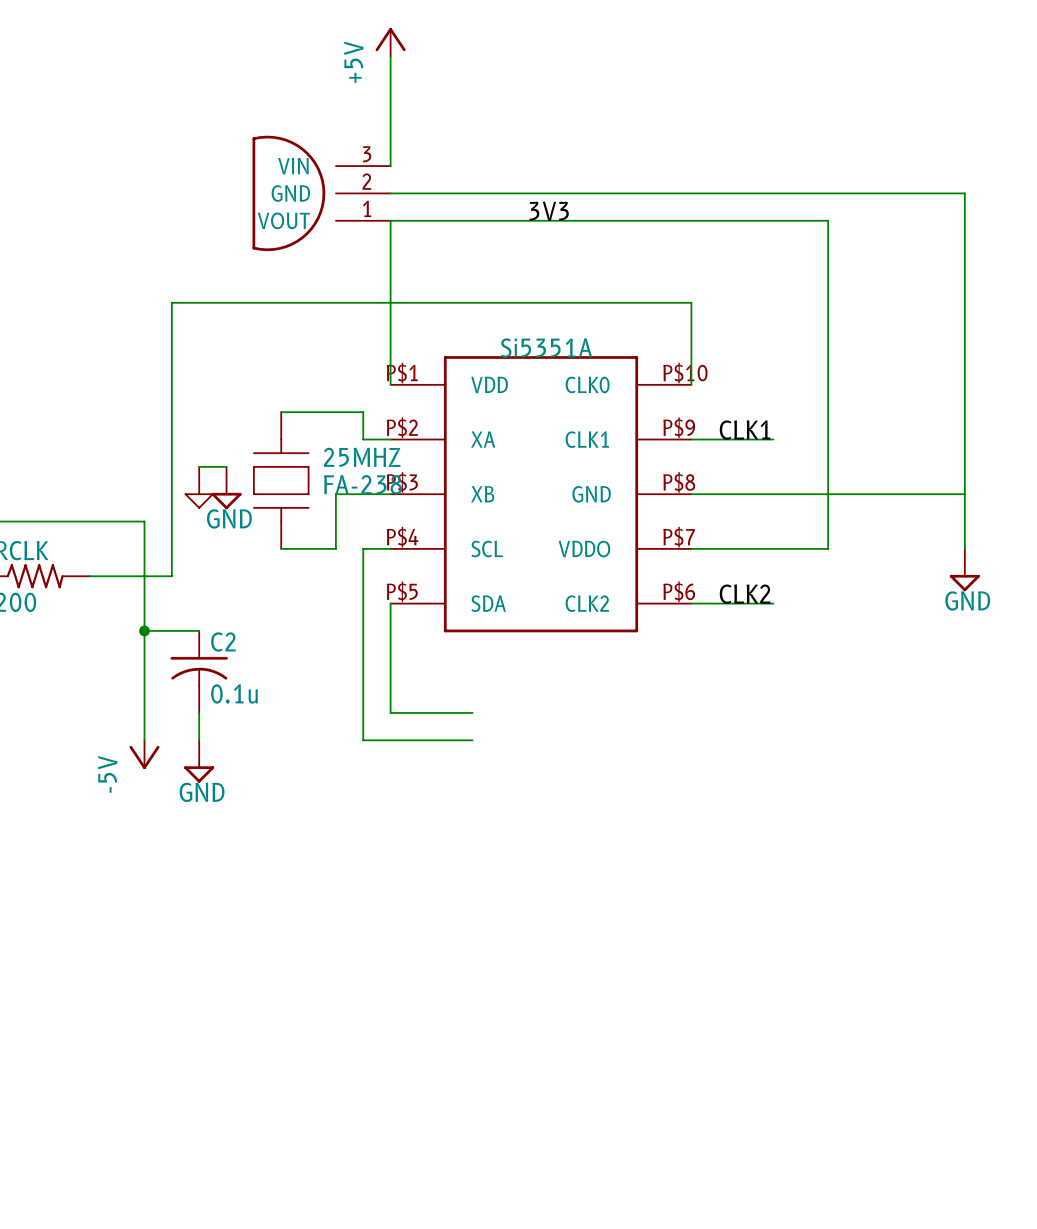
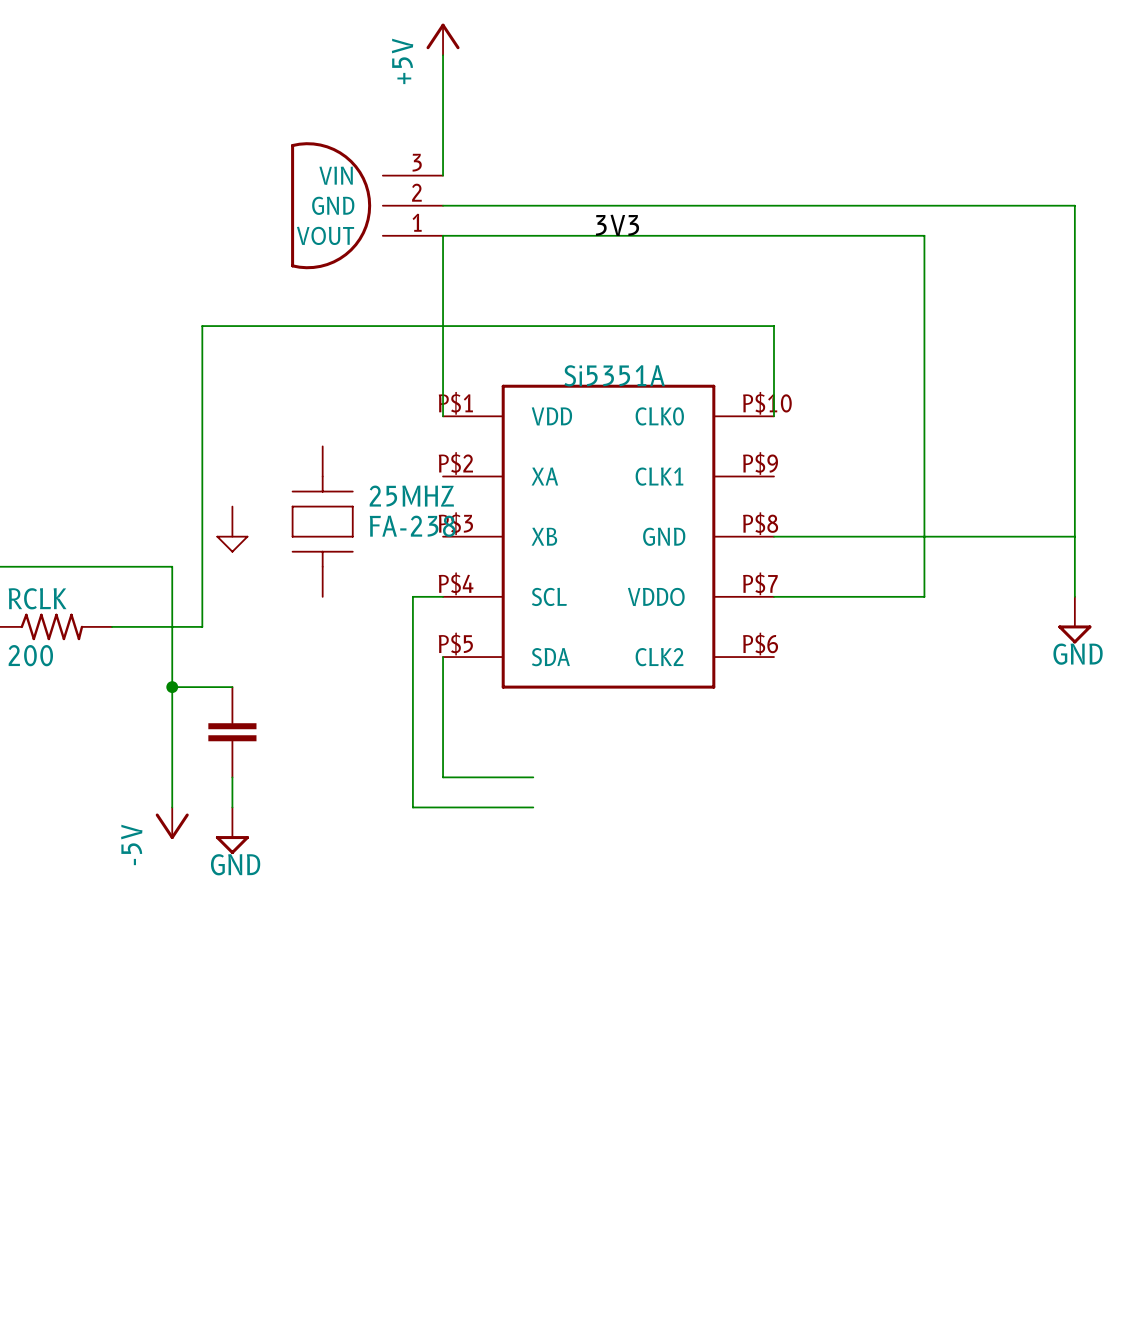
wire: (281, 412) (363, 412) (363, 439) (390, 439) -> none
label: CLK1 (745, 430) -> none
wire: (691, 439) (773, 439) -> none
wire: (199, 466) (226, 466) -> none
power symbol: GND (226, 488) -> none
wire: (390, 494) (335, 494) (335, 548) (281, 548) -> none
label: CLK2 (745, 594) -> none
wire: (691, 603) (773, 603) -> none
C2: 0.1u (199, 671) -> none
part: none -> (232, 732)

